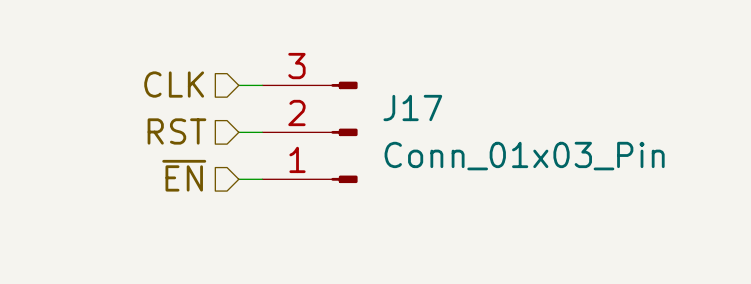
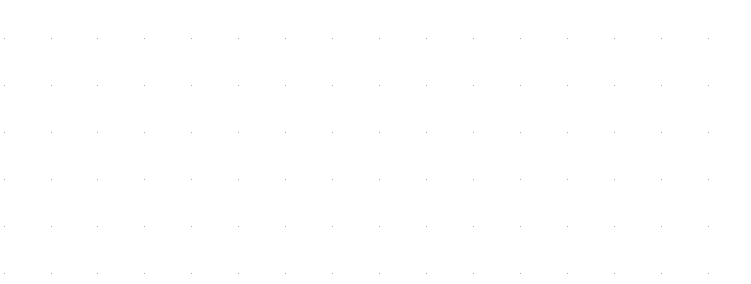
hierarchical label: CLK (174, 84) -> none
wire: (238, 85) (262, 85) -> none
hierarchical label: RST (176, 131) -> none
wire: (238, 132) (262, 132) -> none
J17: Conn_01x03_Pin (309, 132) -> none
hierarchical label: ~{EN} (184, 175) -> none
wire: (238, 179) (262, 179) -> none

